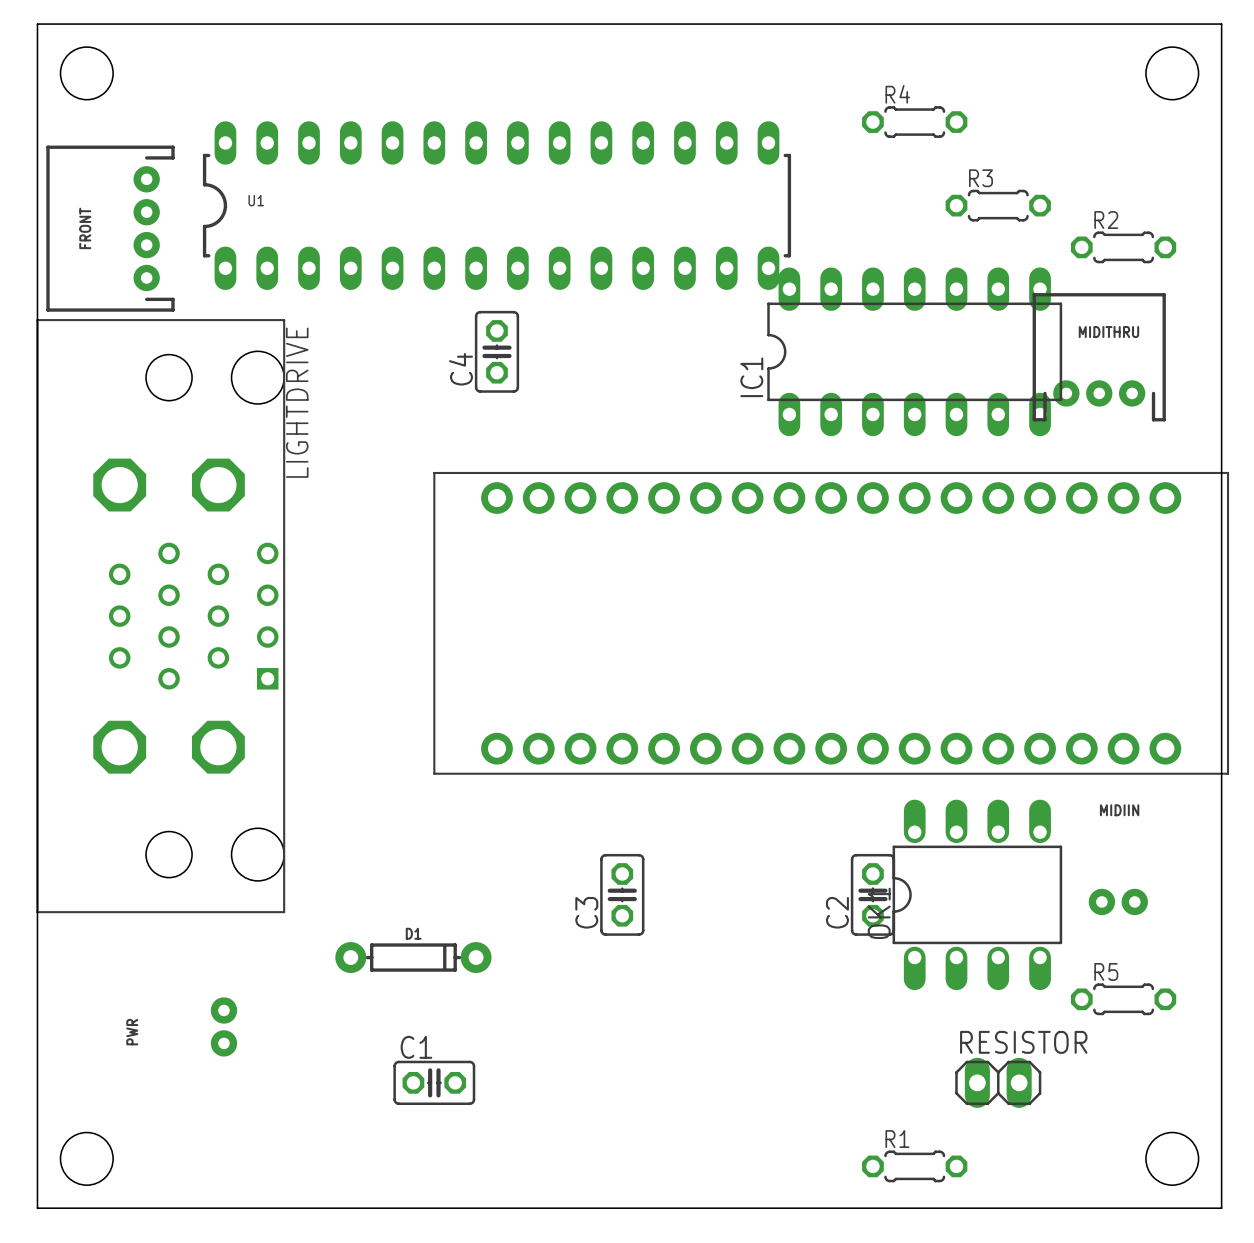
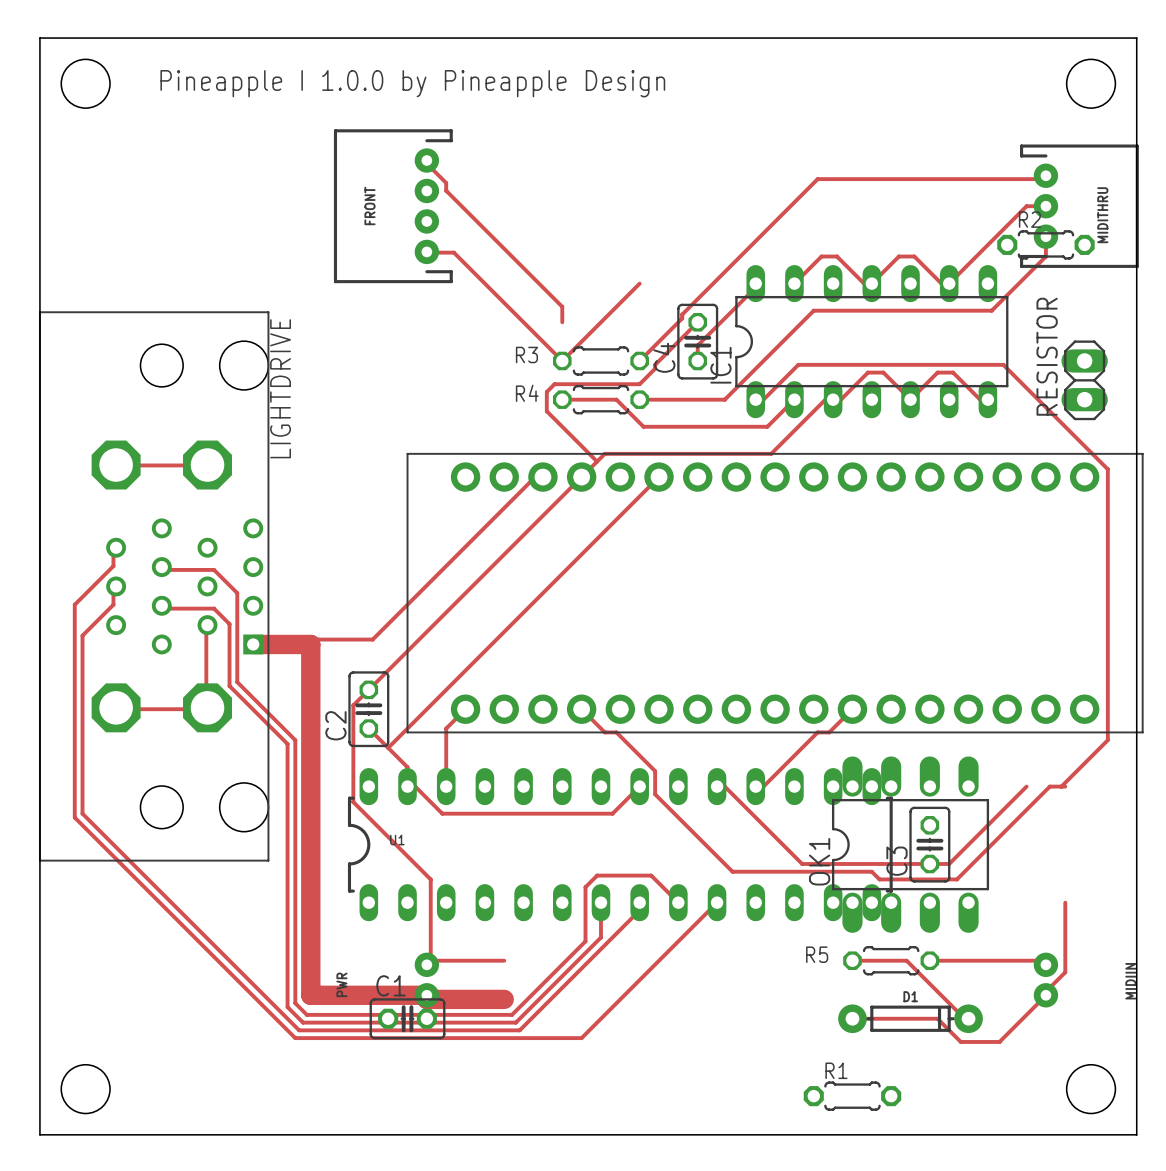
text: none -> Pineapple I 1.0.0 by Pineapple Design (412, 83)
R4 name position: R4 (897, 94) -> R4 (527, 393)
R4 footprint: [862, 106, 968, 138] -> [553, 384, 649, 415]
U1 footprint: [202, 121, 792, 291] -> [347, 768, 893, 922]
track: none -> (426, 160) (426, 163) (446, 183) (446, 190) (562, 306) (562, 322)
track: none -> (1045, 175) (1045, 179) (817, 179) (682, 314) (682, 318) (639, 360)
R3 name position: R3 (981, 178) -> R3 (526, 354)
R3 footprint: [945, 189, 1051, 222] -> [553, 346, 649, 376]
track: none -> (1045, 206) (1026, 206) (949, 283) (941, 283) (914, 256) (898, 256) (871, 283) (864, 283) (837, 256) (821, 256) (794, 283)
FRONT position: (110, 228) -> (393, 206)
track: none -> (1045, 236) (1045, 256) (991, 310) (813, 310) (724, 399) (639, 399)
track: none -> (426, 251) (453, 252) (562, 360) (639, 283)
IC1 footprint: [767, 267, 1063, 437] -> [735, 265, 1009, 419]
track: none -> (755, 283) (755, 287) (697, 345) (697, 360)
C4 footprint: [474, 310, 520, 393] -> [677, 303, 719, 380]
track: none -> (697, 322) (655, 364) (655, 368) (639, 384) (554, 384) (546, 391) (546, 411) (597, 461)
MIDITHRU rotation: 0° (1099, 357) -> 90° clockwise (1079, 206)
MIDITHRU position: (1099, 357) -> (1079, 206)
RESISTOR: none -> (1084, 380)
track: none -> (562, 399) (616, 399) (643, 426) (767, 426) (794, 399)
track: none -> (755, 399) (763, 399) (798, 364) (1003, 364) (1107, 469) (1107, 740) (1061, 786)
track: none -> (987, 399) (980, 399) (953, 372) (937, 372) (910, 399) (883, 372) (867, 372) (840, 399) (825, 399) (771, 453) (604, 453) (353, 705) (353, 802) (430, 879) (430, 960)
track: none -> (116, 465) (207, 465)
track: none -> (542, 477) (535, 477) (372, 639) (318, 639) (310, 644)
track: none -> (659, 477) (388, 747)
track: none -> (116, 547) (113, 550) (113, 566) (74, 604) (74, 817) (295, 1038) (581, 1038) (717, 902)
track: none -> (161, 567) (163, 569) (214, 569) (237, 593) (237, 682) (295, 740) (295, 1003) (306, 1014) (511, 1014) (585, 941) (585, 887) (597, 875) (651, 875) (678, 902)
track: none -> (116, 586) (113, 589) (113, 604) (82, 635) (82, 813) (299, 1030) (519, 1030) (639, 910) (639, 902)
track: none -> (161, 605) (163, 608) (214, 608) (229, 624) (229, 686) (287, 744) (287, 1007) (303, 1022) (515, 1022) (600, 937) (600, 902)
track: none -> (207, 625) (206, 709) (116, 707)
track: none -> (253, 644) (310, 644)
track: none -> (310, 644) (310, 995) (426, 995) (426, 999) (504, 999)
track: none -> (465, 709) (446, 728) (446, 786)
track: none -> (581, 709) (604, 732) (616, 732) (655, 771) (655, 794) (732, 871) (871, 871) (879, 879) (956, 879) (1049, 786) (1065, 786)
track: none -> (852, 709) (829, 732) (817, 732) (763, 786) (755, 786)
track: none -> (368, 728) (407, 767) (407, 786) (415, 786) (442, 813) (612, 813) (639, 786)
track: none -> (717, 786) (724, 786) (802, 863) (949, 863) (1026, 786)
C3 footprint: [600, 853, 645, 936] -> [909, 806, 951, 883]
C2 footprint: [850, 853, 896, 936] -> [348, 671, 390, 748]
MIDIIN rotation: 0° (1118, 901) -> 90° clockwise (1045, 980)
MIDIIN position: (1118, 901) -> (1045, 980)
D1 position: (413, 957) -> (910, 1018)
track: none -> (1065, 902) (1065, 972) (1045, 991) (1045, 995) (999, 1041) (960, 1041) (937, 1018) (852, 1018)
R5 name position: R5 (1106, 971) -> R5 (817, 954)
R5 footprint: [1070, 983, 1177, 1016] -> [843, 946, 940, 976]
track: none -> (430, 960) (504, 960)
track: none -> (852, 960) (906, 960) (964, 1018) (968, 1018)
track: none -> (929, 960) (1042, 960) (1045, 964)
PWR position: (223, 1026) -> (426, 980)
RESISTOR: (998, 1082) -> none

